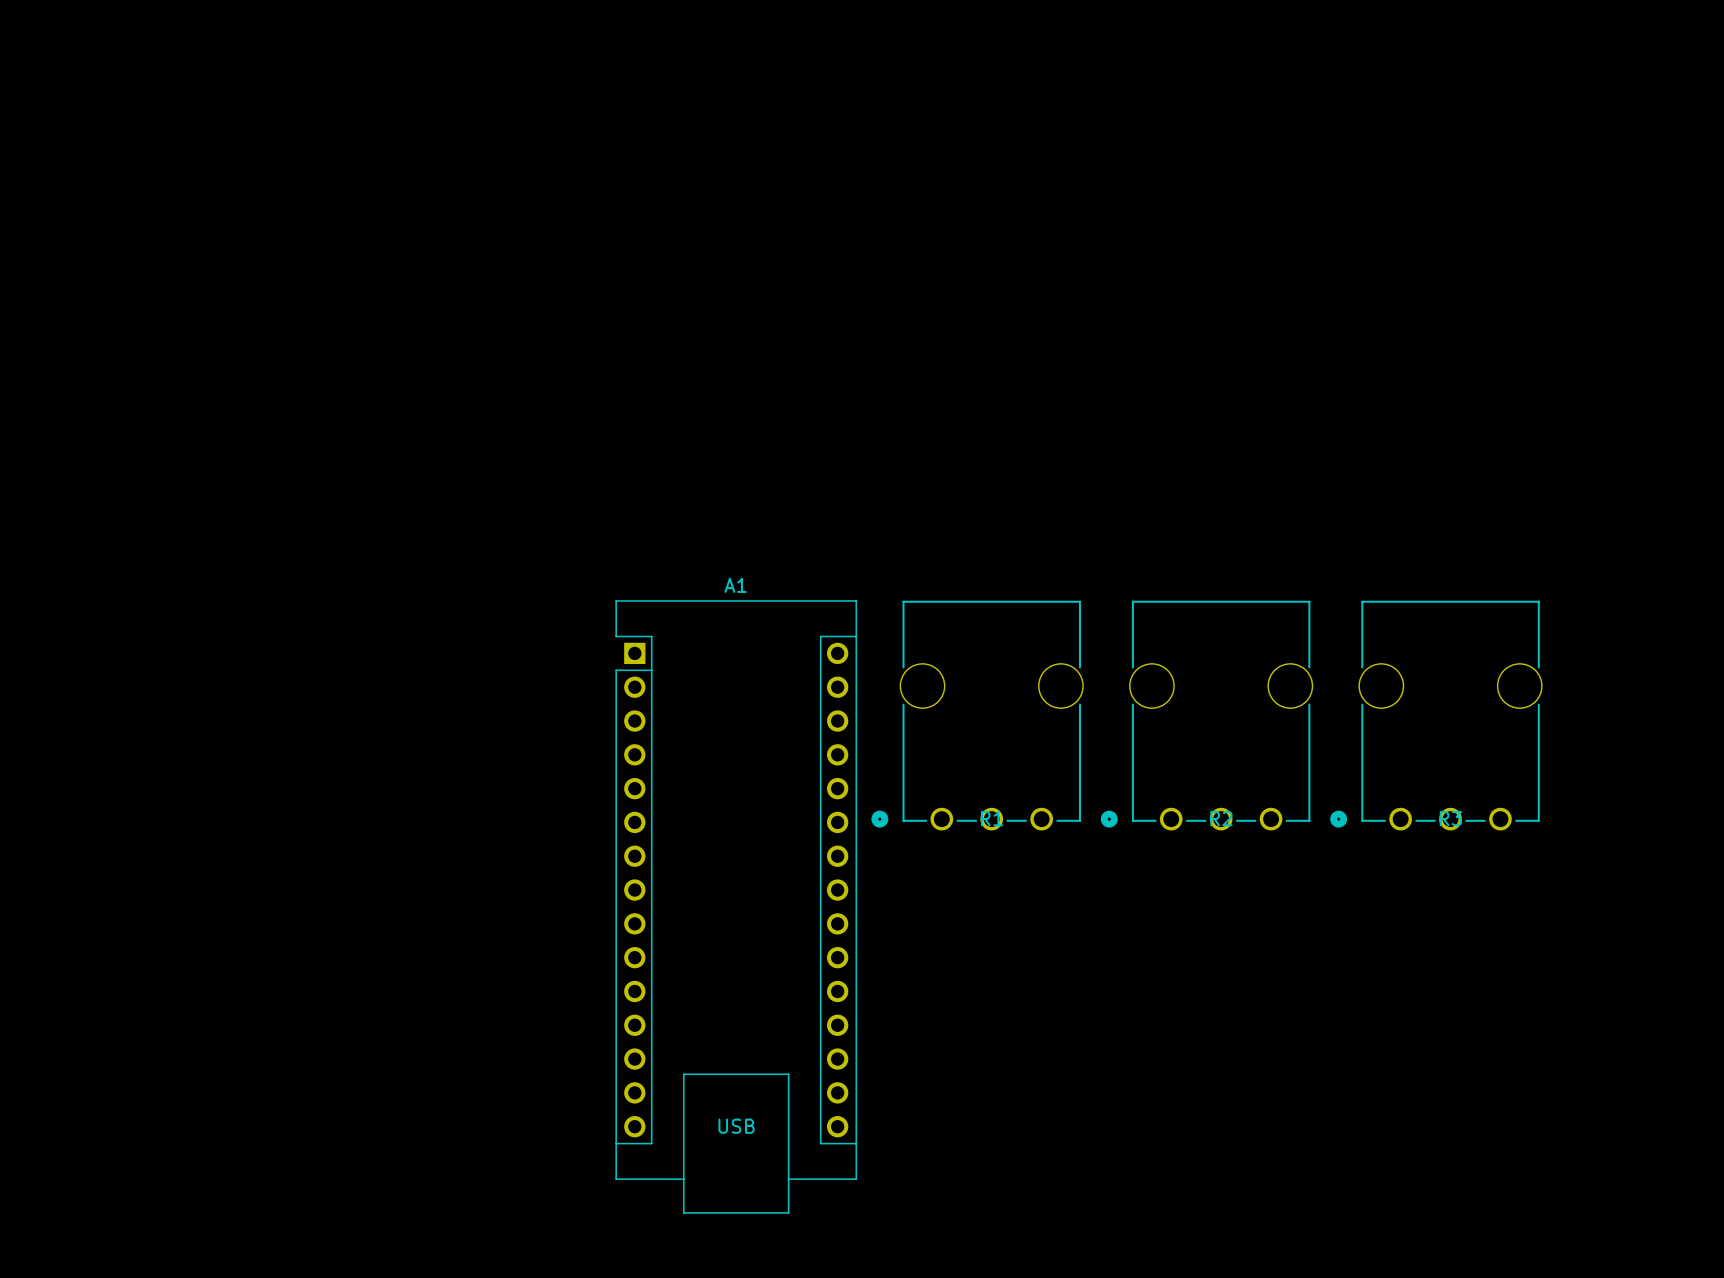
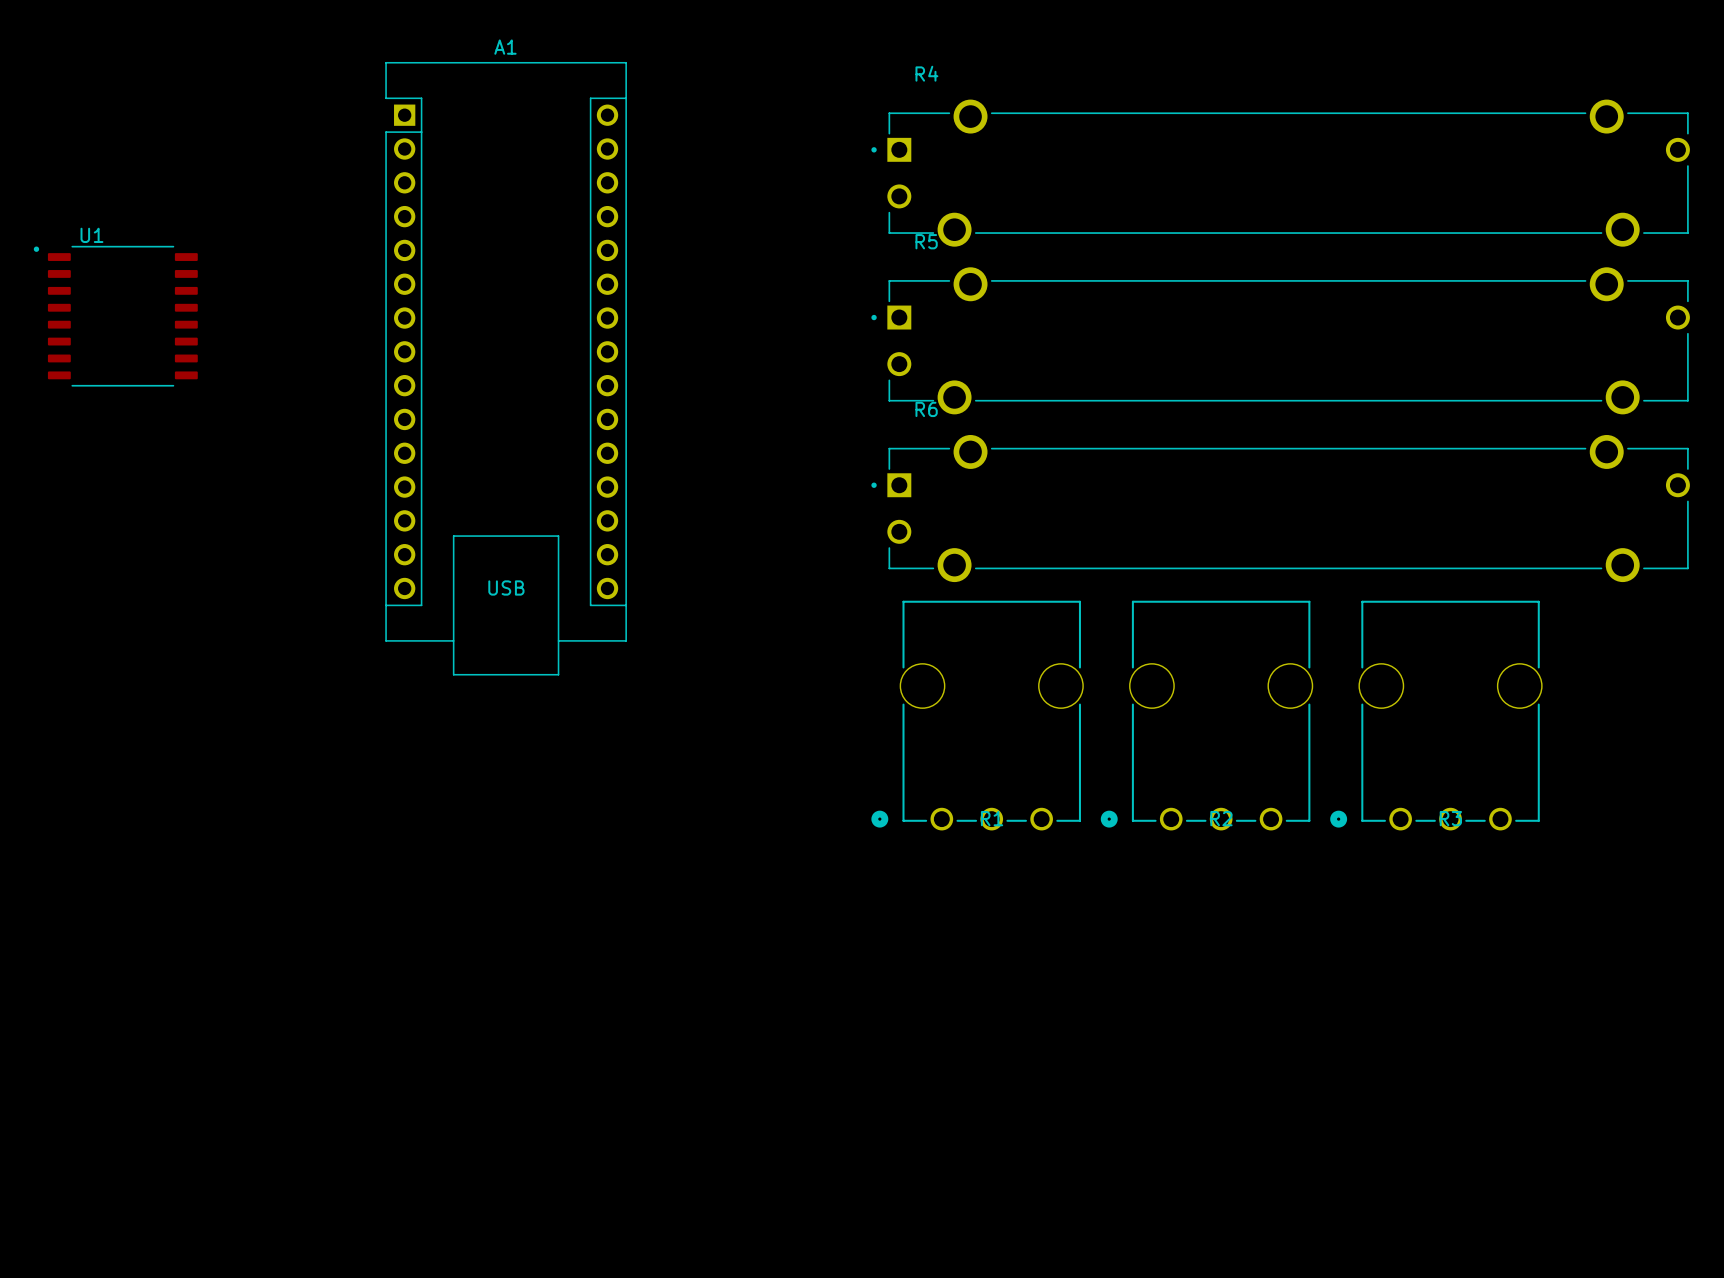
R4: none -> (1280, 173)
U1: none -> (115, 316)
R5: none -> (1280, 340)
R6: none -> (1280, 508)
A1 position: (736, 906) -> (506, 368)

